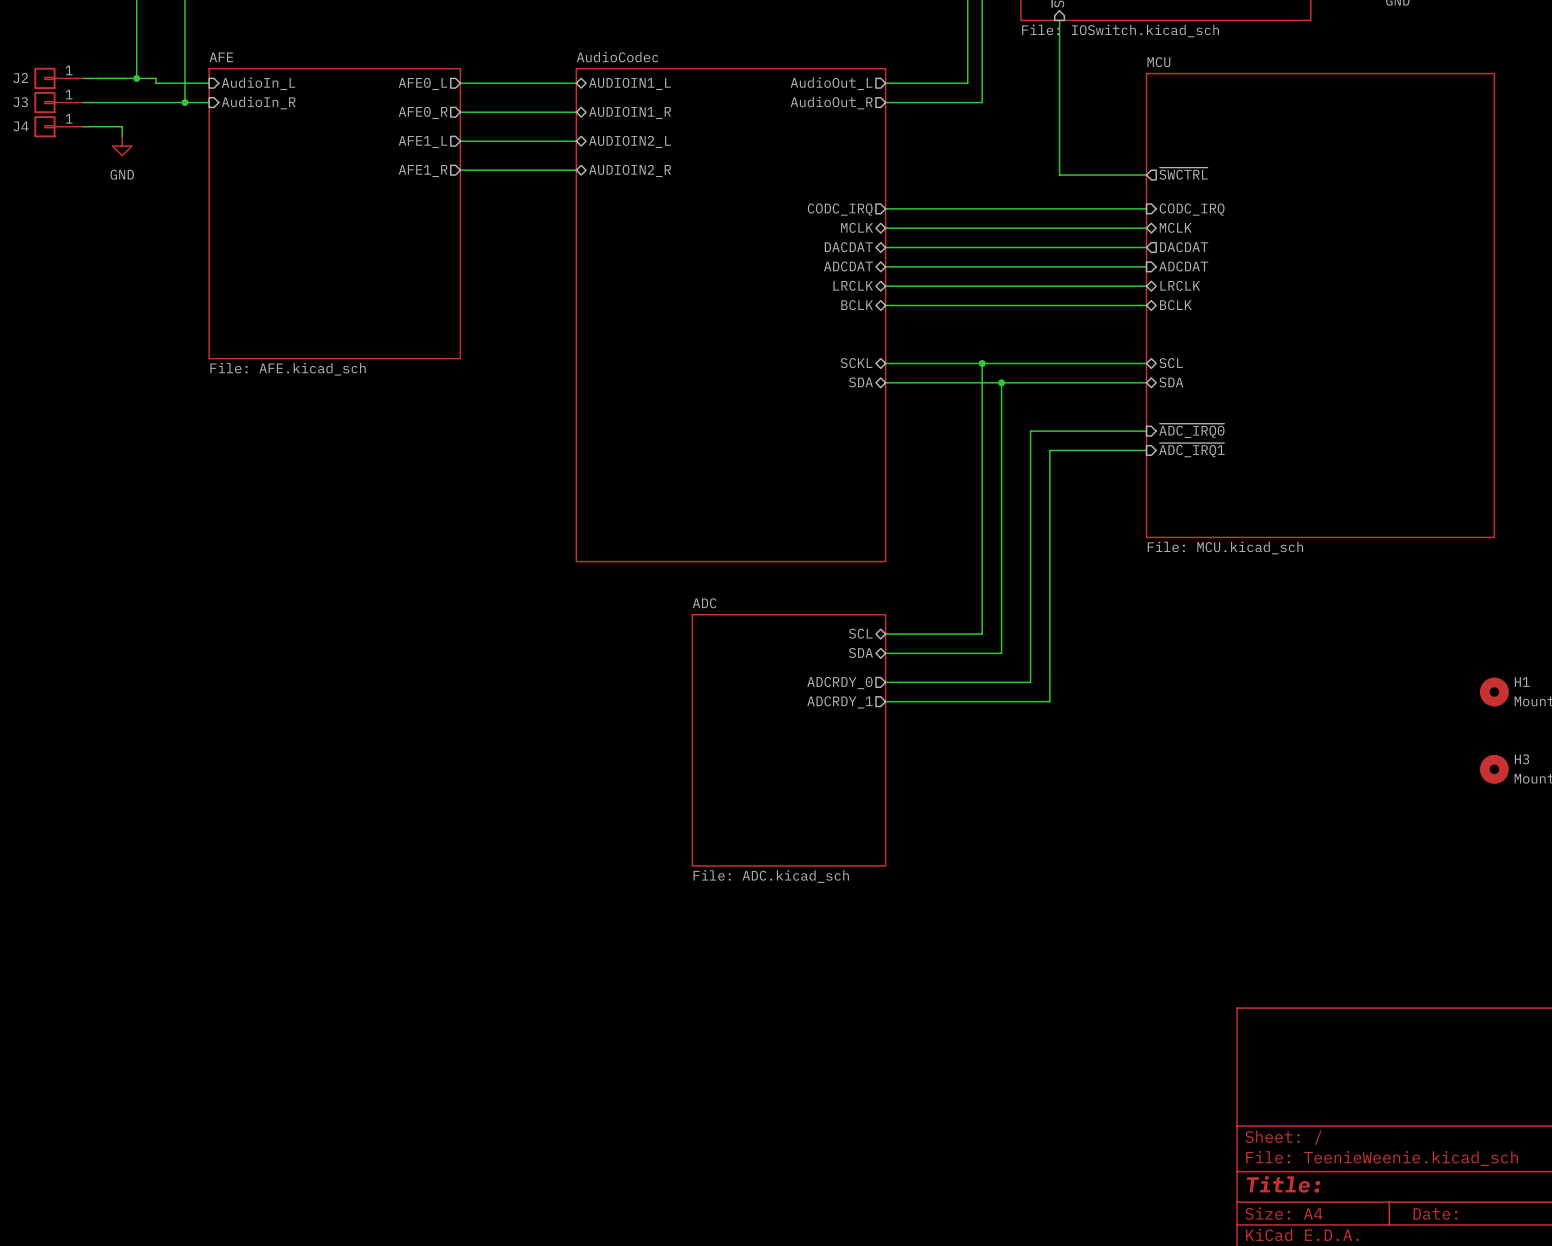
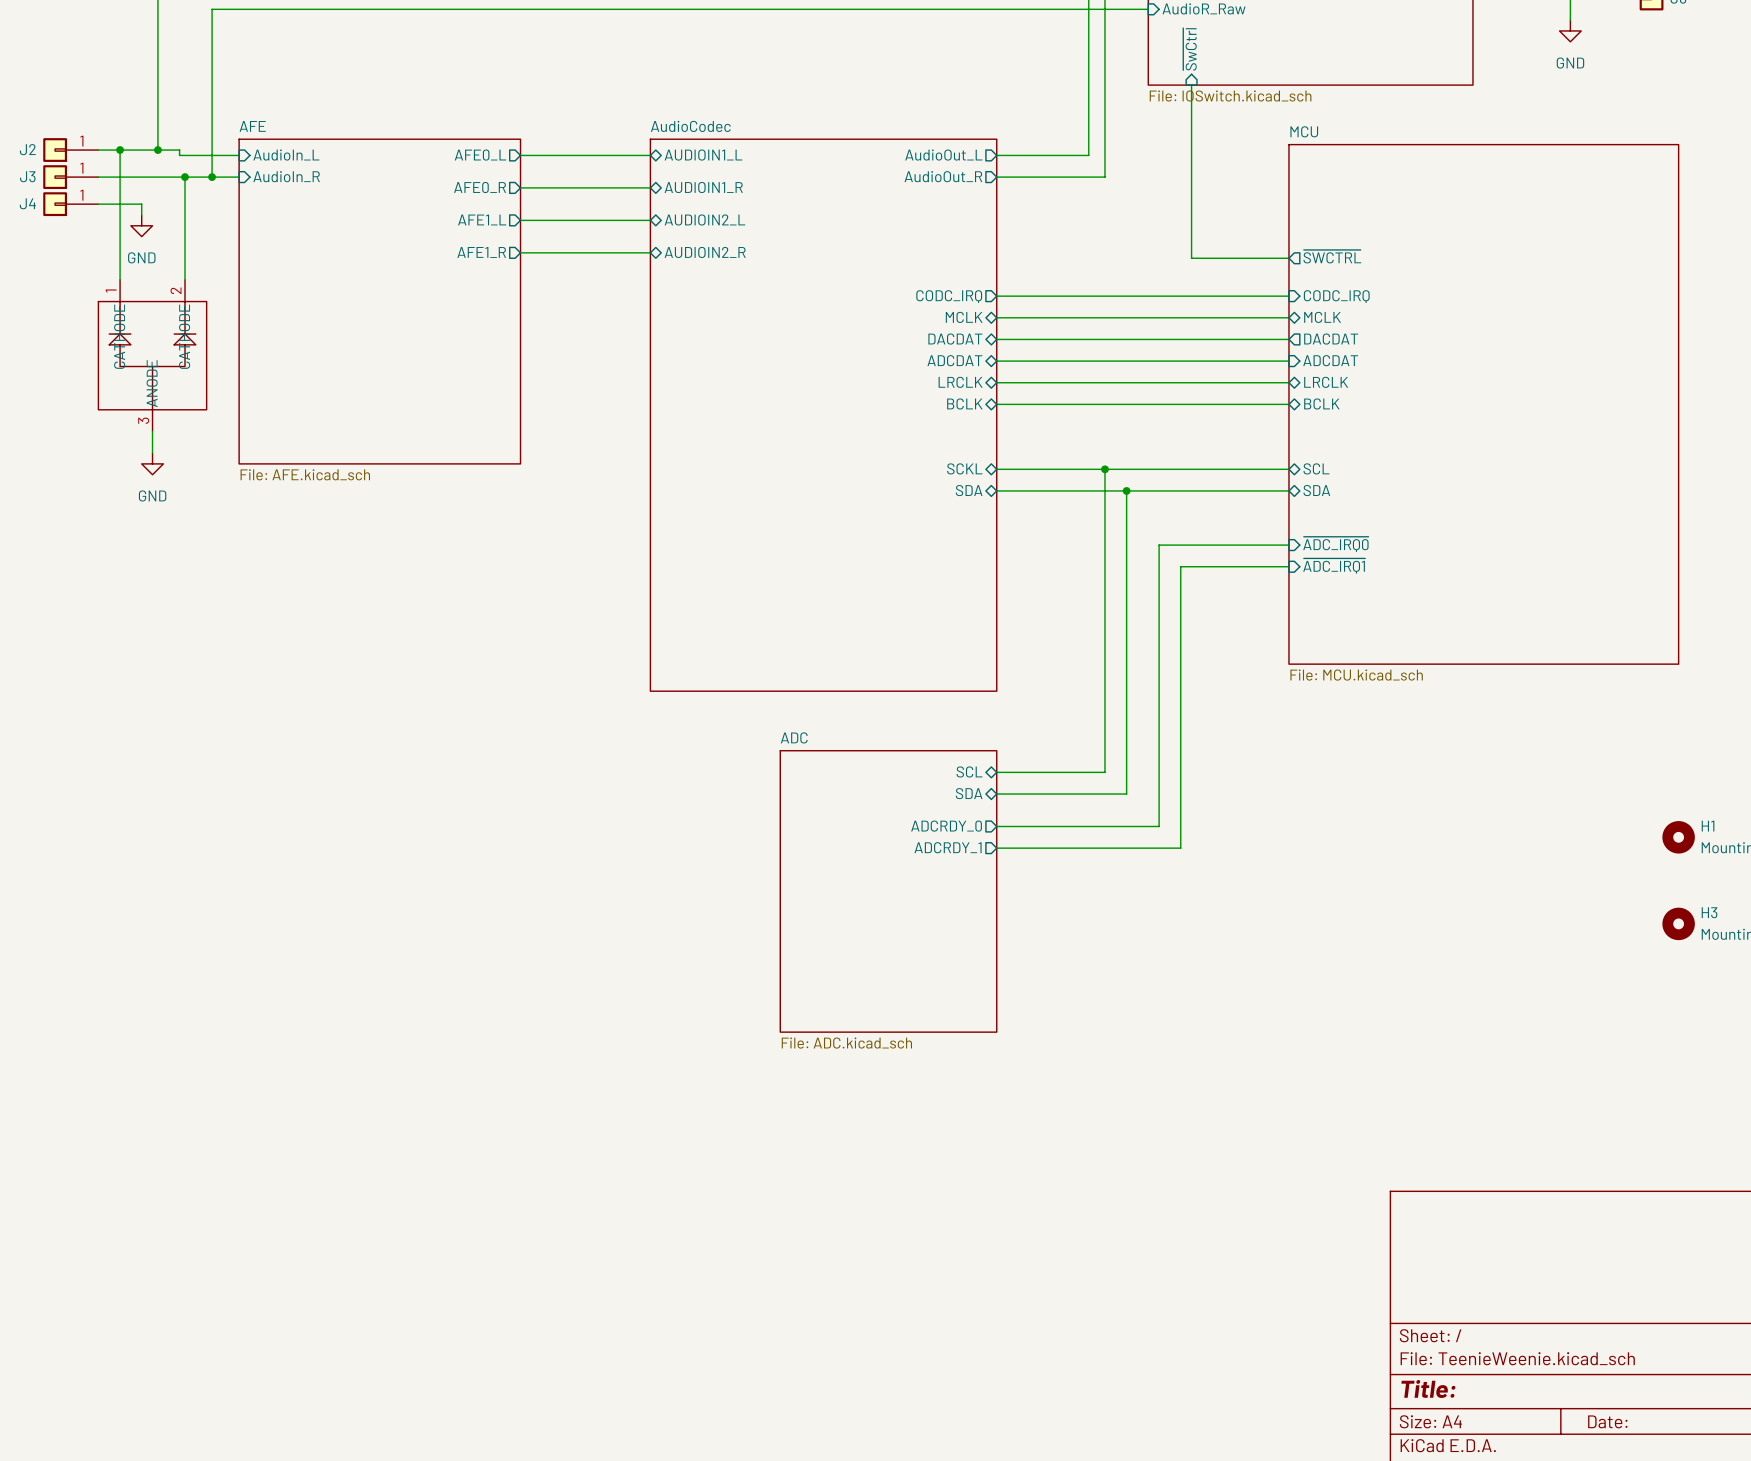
wire: none -> (120, 150) (120, 279)
junction: none -> (120, 150)
wire: none -> (185, 177) (185, 279)
junction: none -> (185, 177)
part: none -> (152, 355)
wire: none -> (152, 431) (152, 453)
power symbol: none -> GND (152, 463)

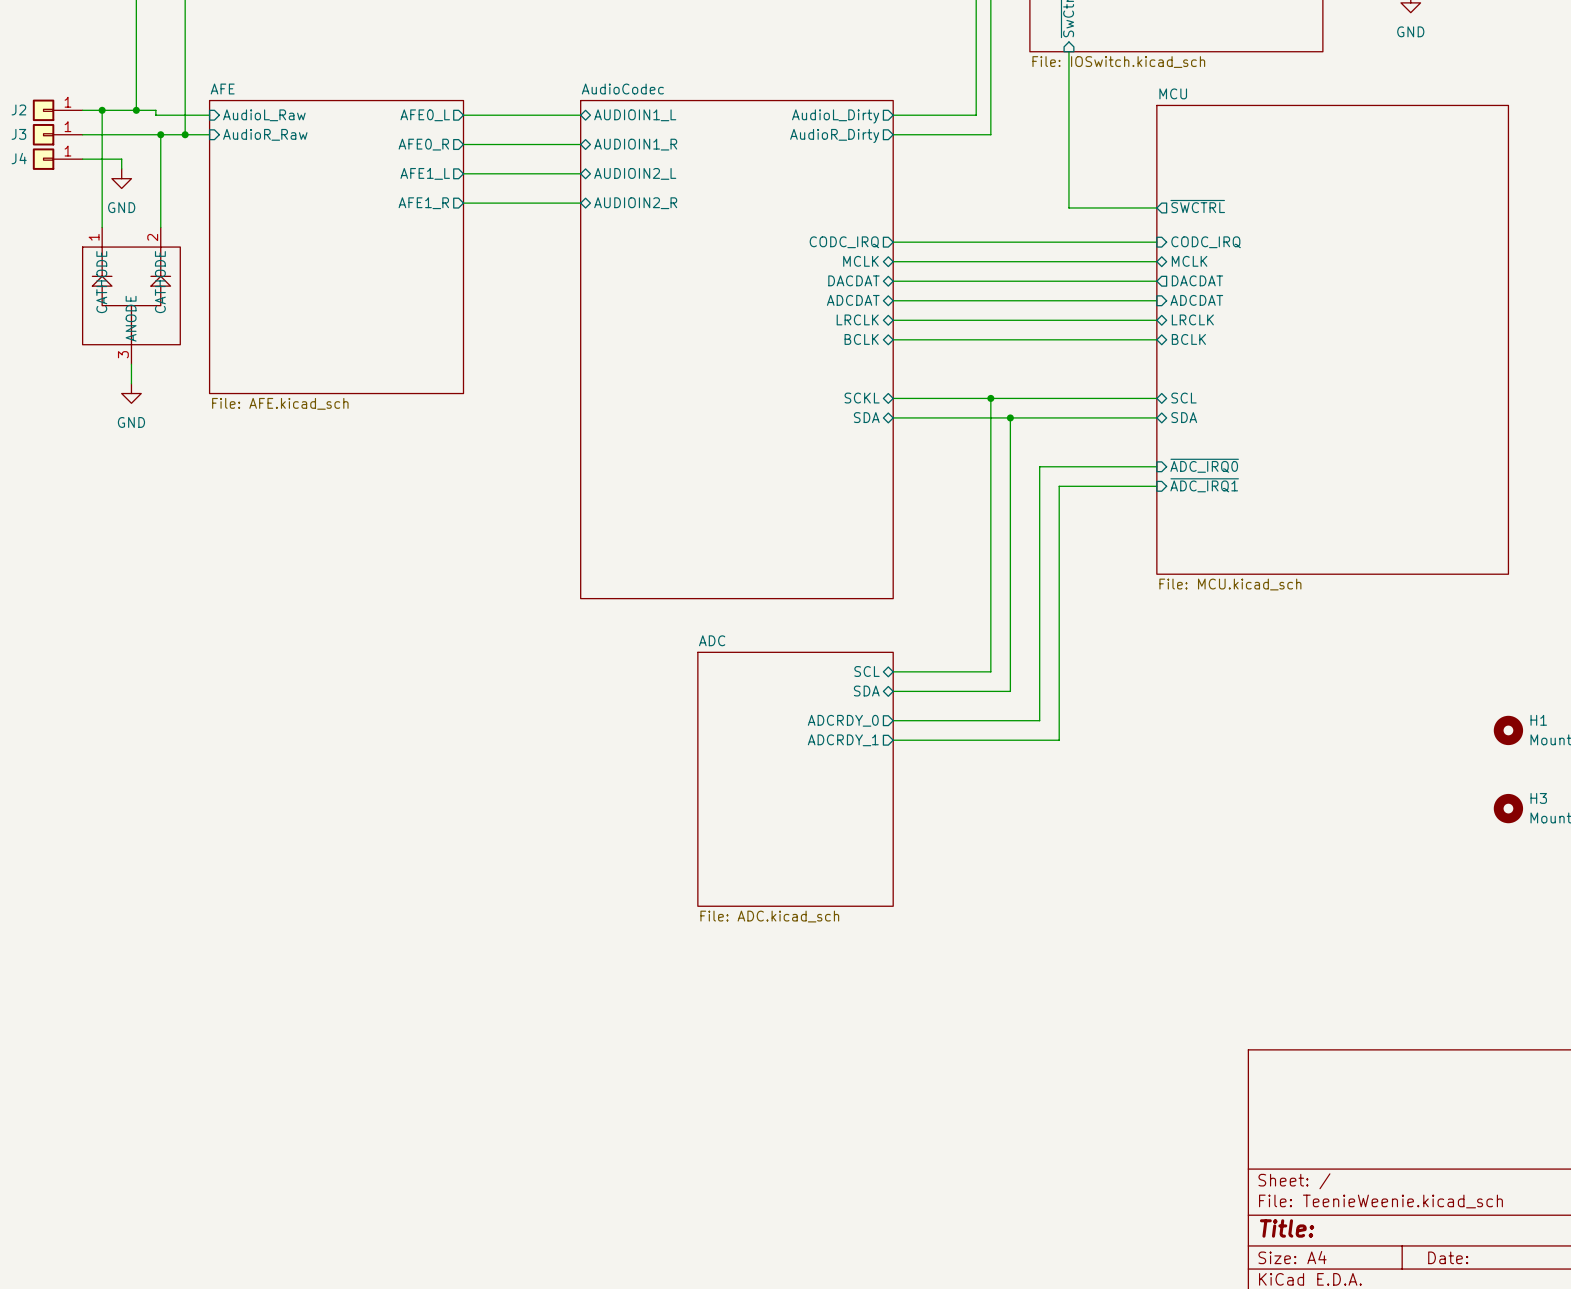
sheet pin: AudioIn_L (286, 155) -> AudioL_Raw (264, 115)
sheet pin: AudioOut_L (943, 155) -> AudioL_Dirty (835, 116)
sheet pin: AudioIn_R (286, 176) -> AudioR_Raw (265, 134)
sheet pin: AudioOut_R (943, 176) -> AudioR_Dirty (834, 136)

